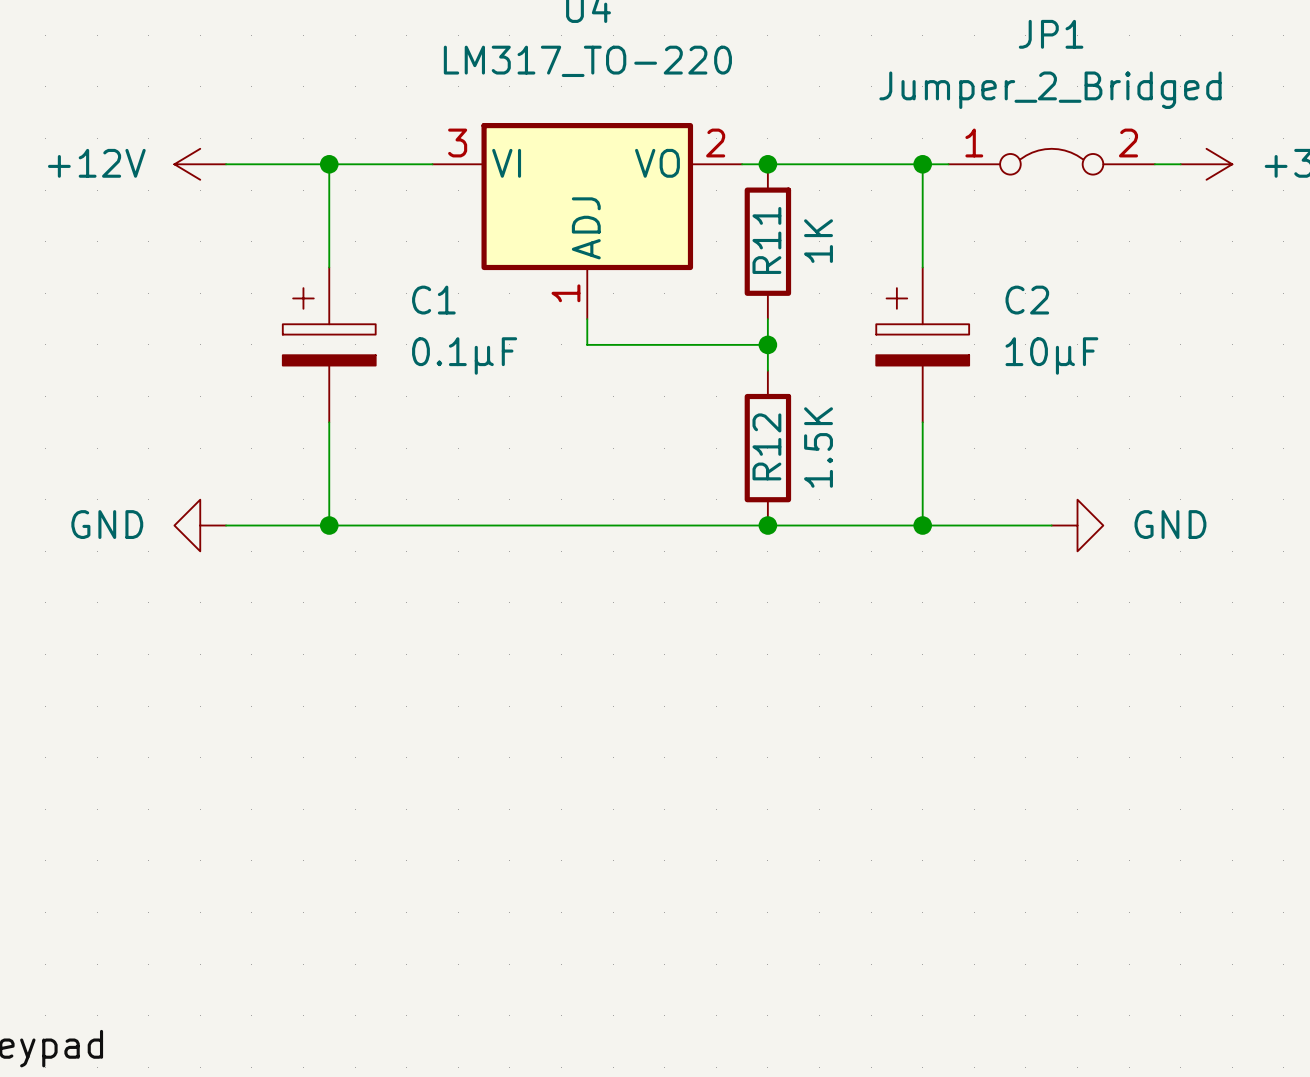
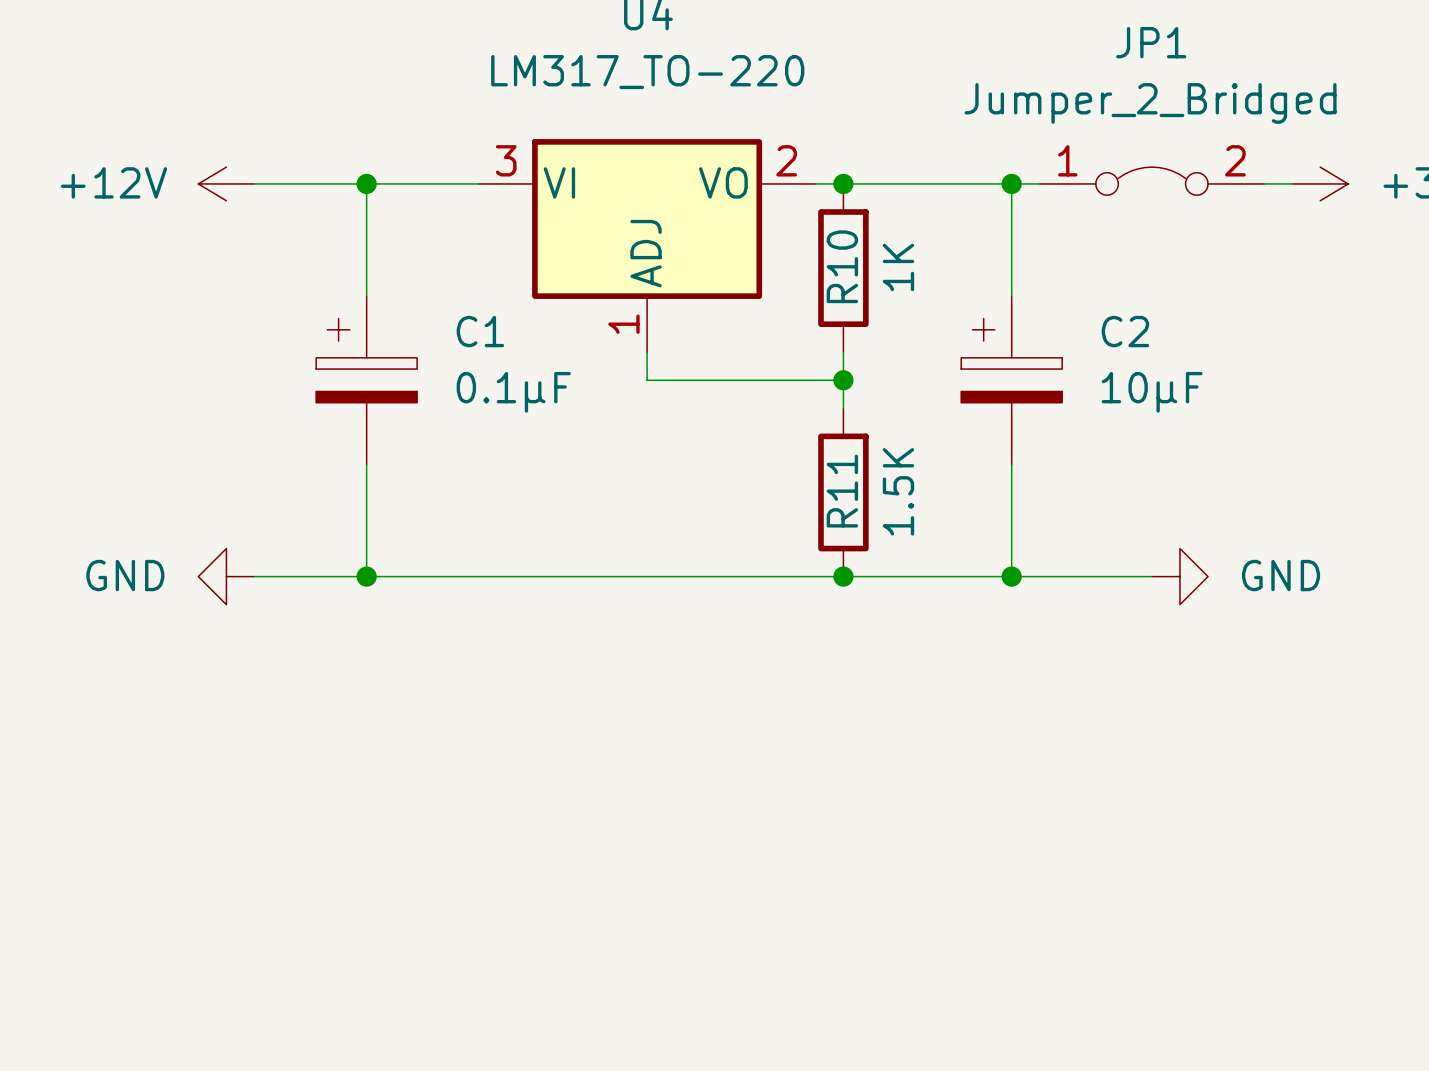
R11 name: R11 (766, 240) -> R10 (842, 266)
R12 name: R12 (766, 446) -> R11 (842, 491)

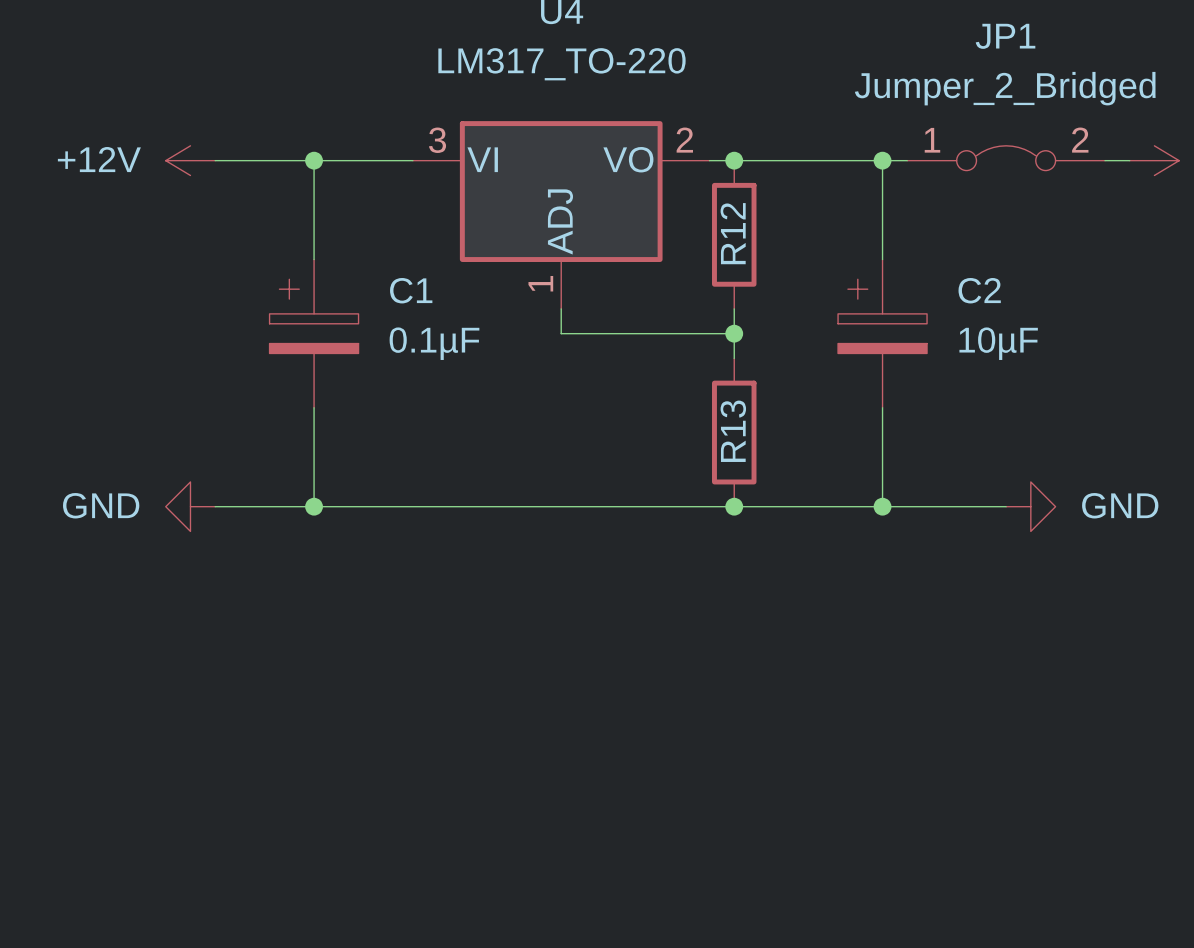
R10 name: R10 (842, 266) -> R12 (733, 233)
R10 value: 1K (898, 267) -> none
R11 name: R11 (842, 491) -> R13 (733, 431)
R11 value: 1.5K (898, 491) -> none

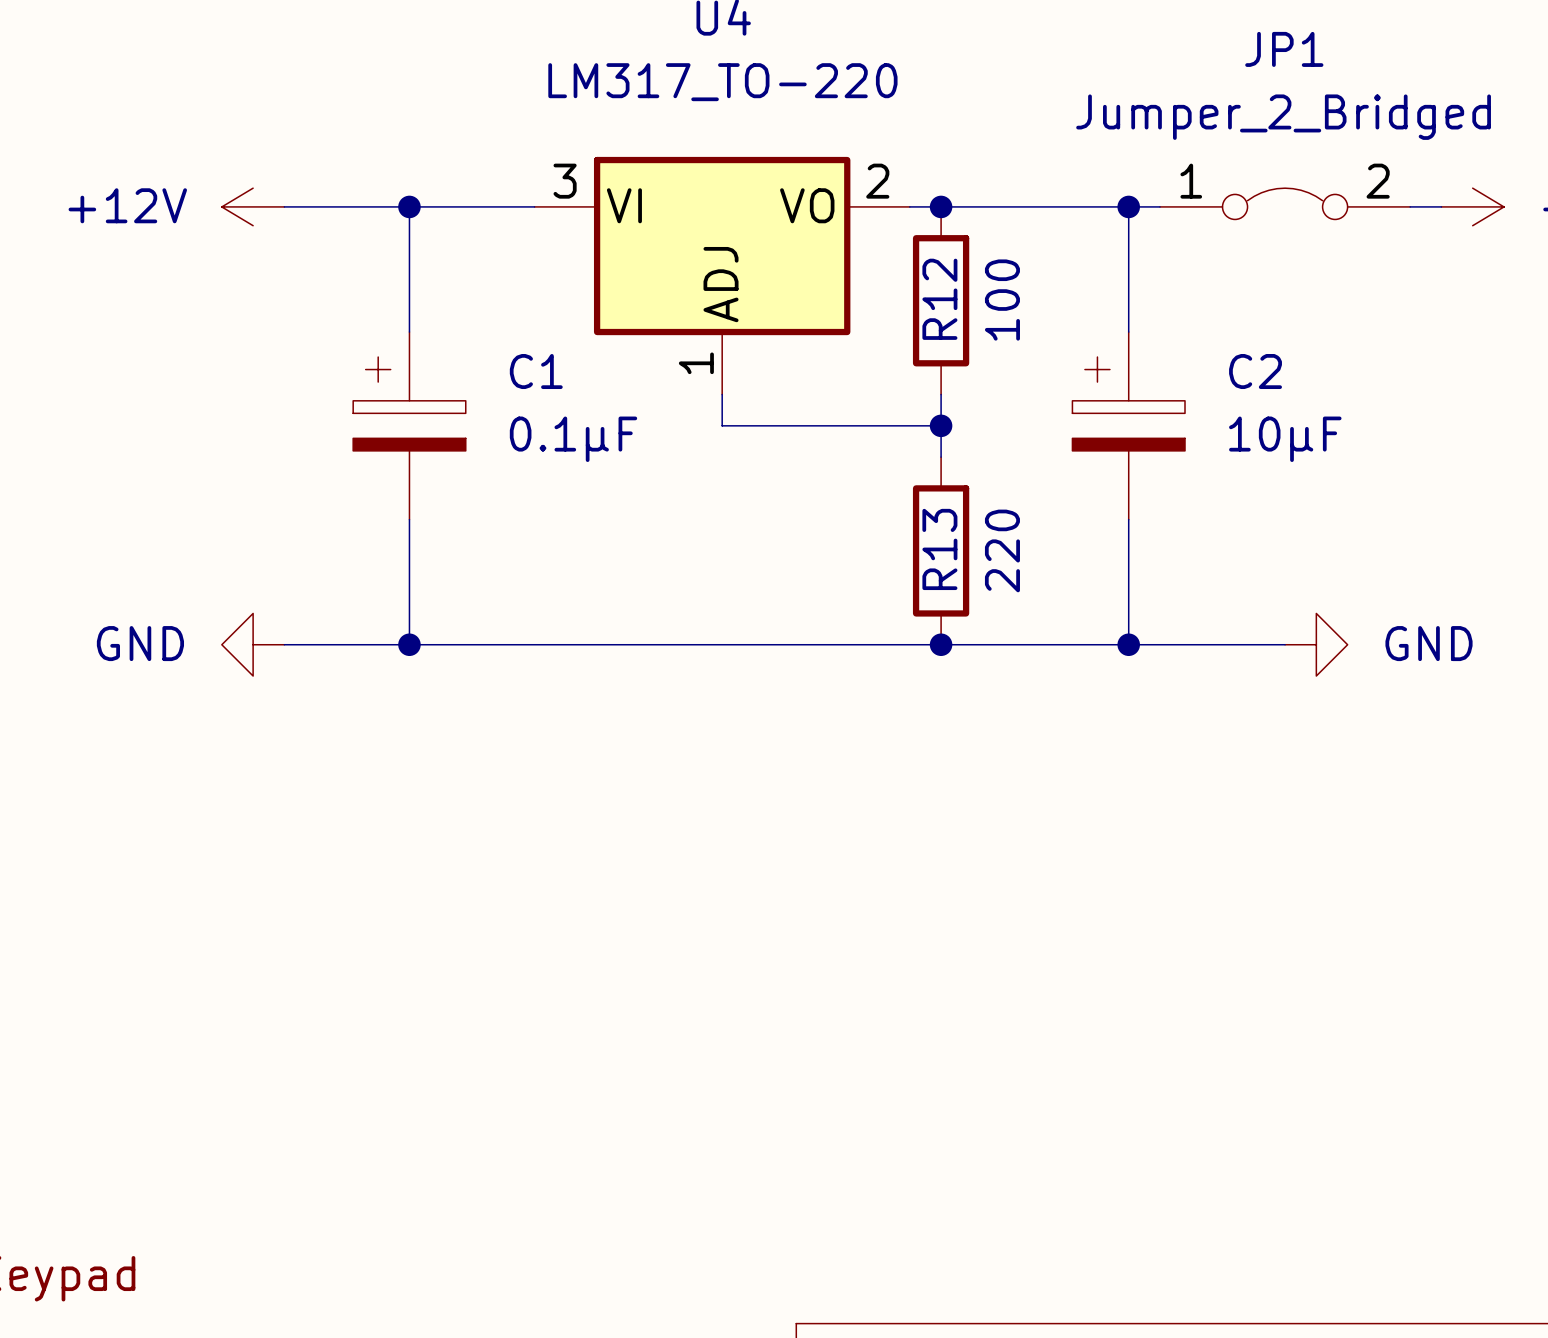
R12 value: none -> 100 (1002, 300)
R13 value: none -> 220 (1002, 550)

